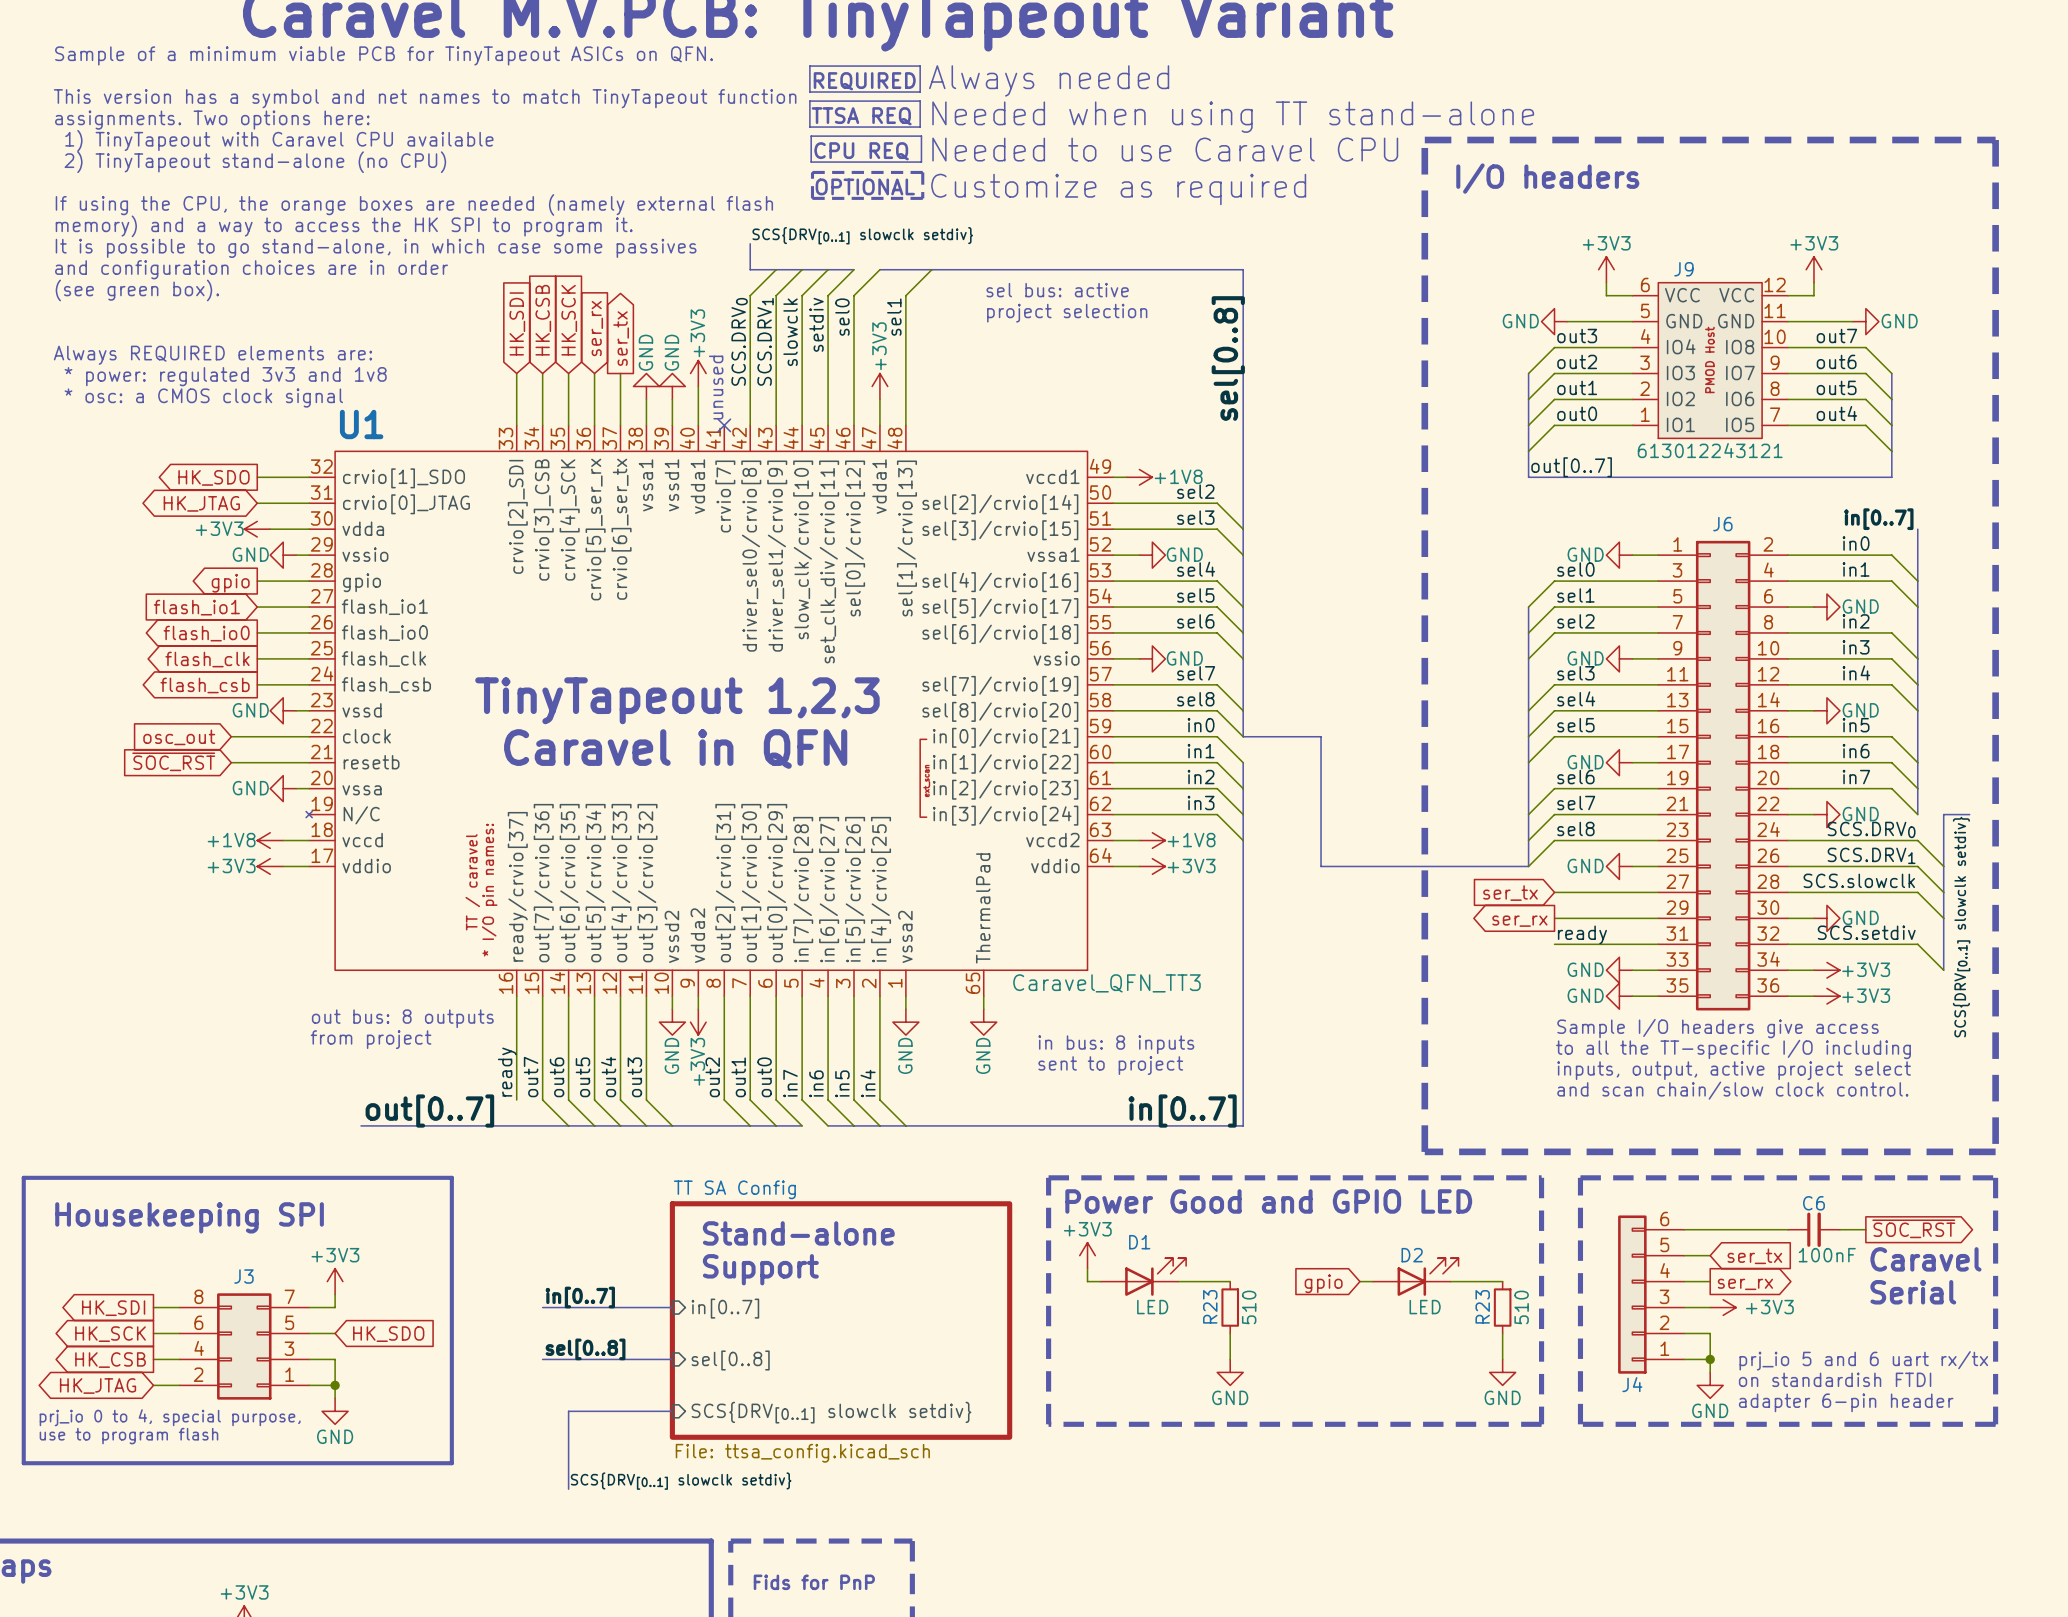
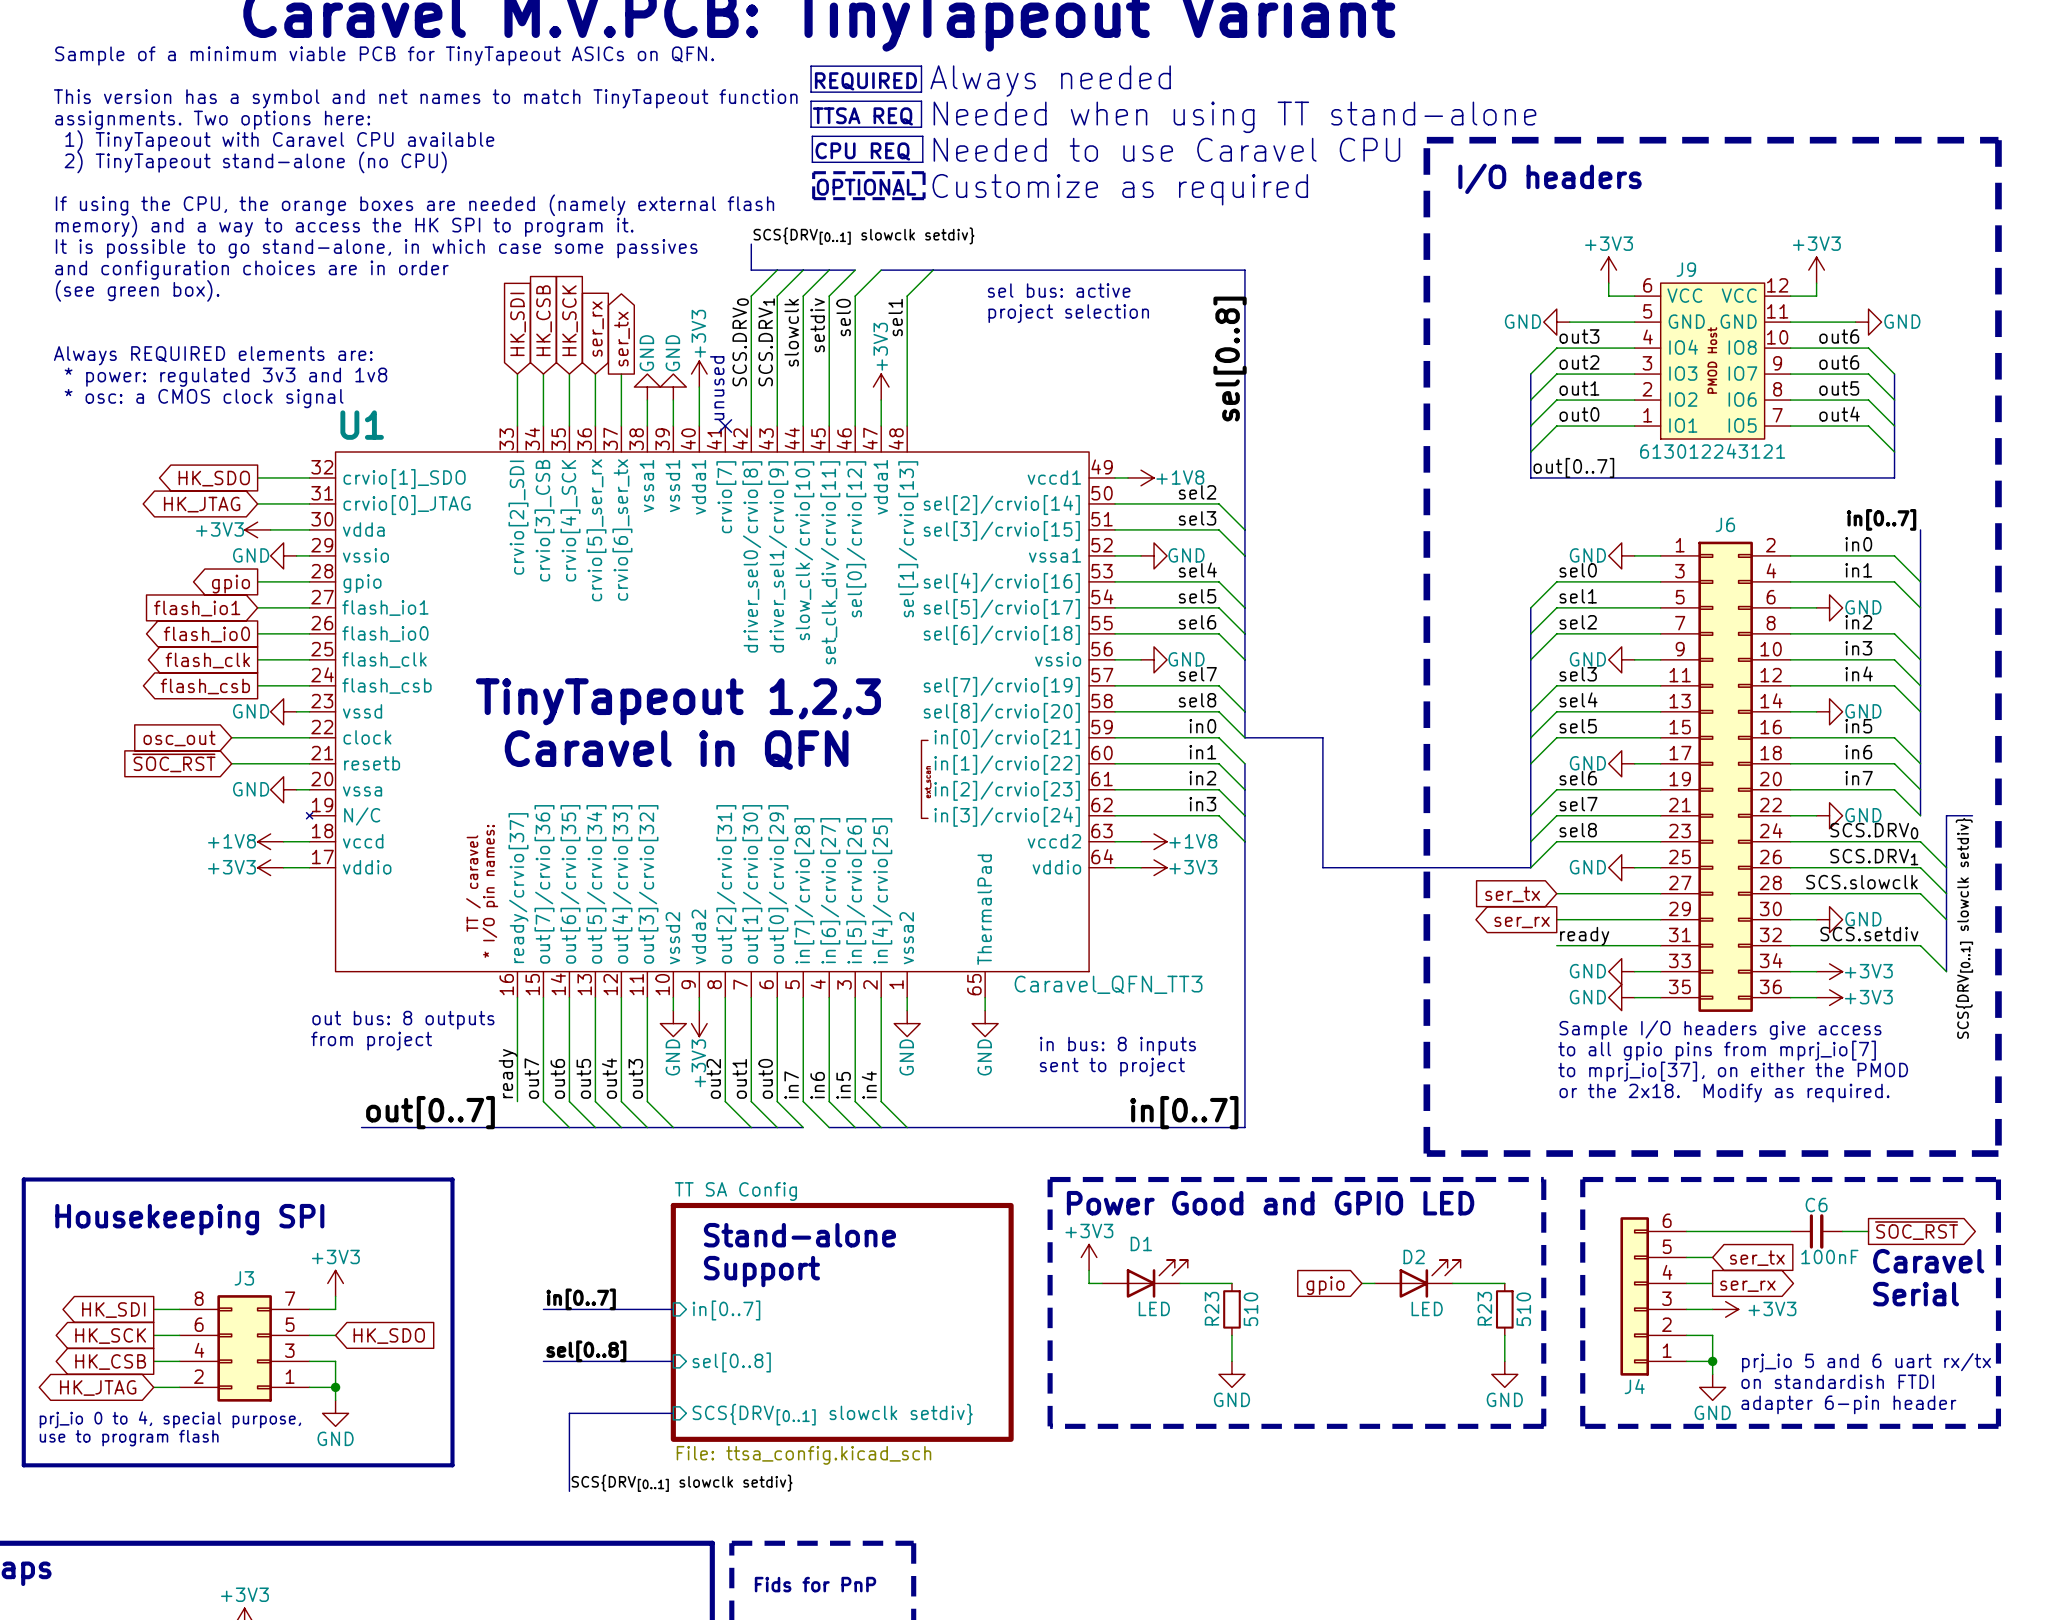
label: out7 (1836, 335) -> out6 (1839, 336)
text: to all the TT-specific I/O including (1733, 1049) -> to all gpio pins from mprj_io[7] (1717, 1050)
text: inputs, output, active project select (1734, 1070) -> to mprj_io[37], on either the PMOD (1733, 1071)
text: and scan chain/slow clock control. (1732, 1090) -> or the 2x18. Modify as required. (1724, 1093)

